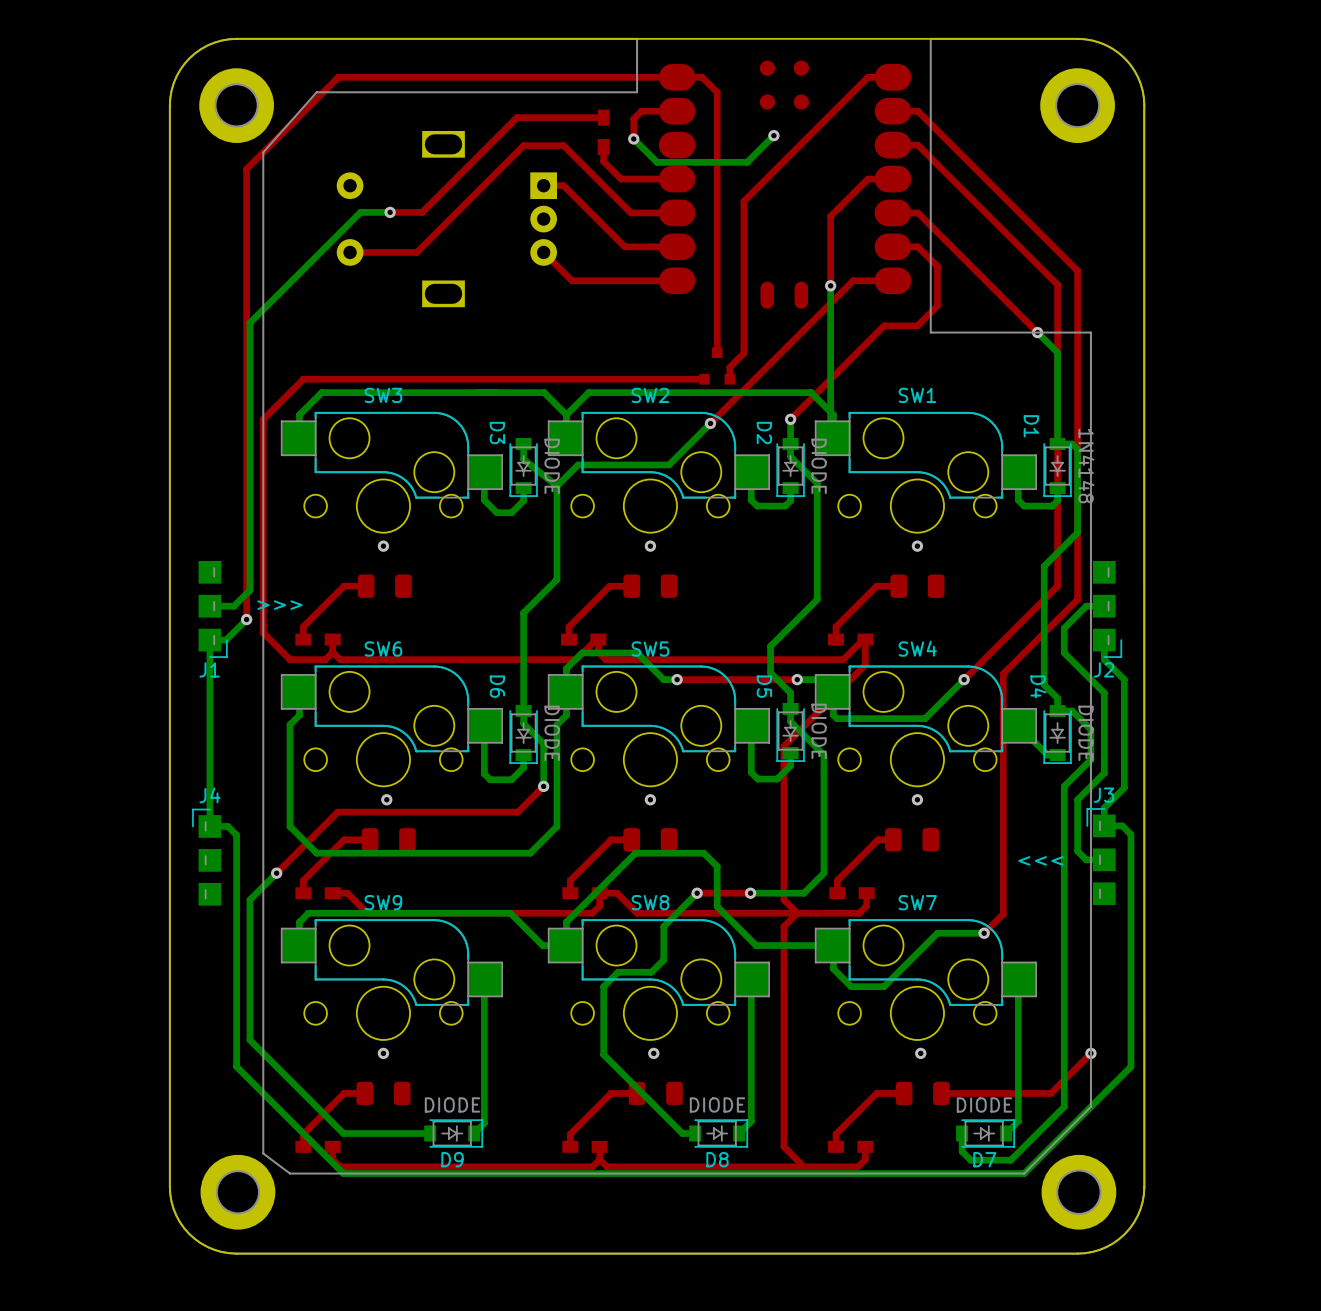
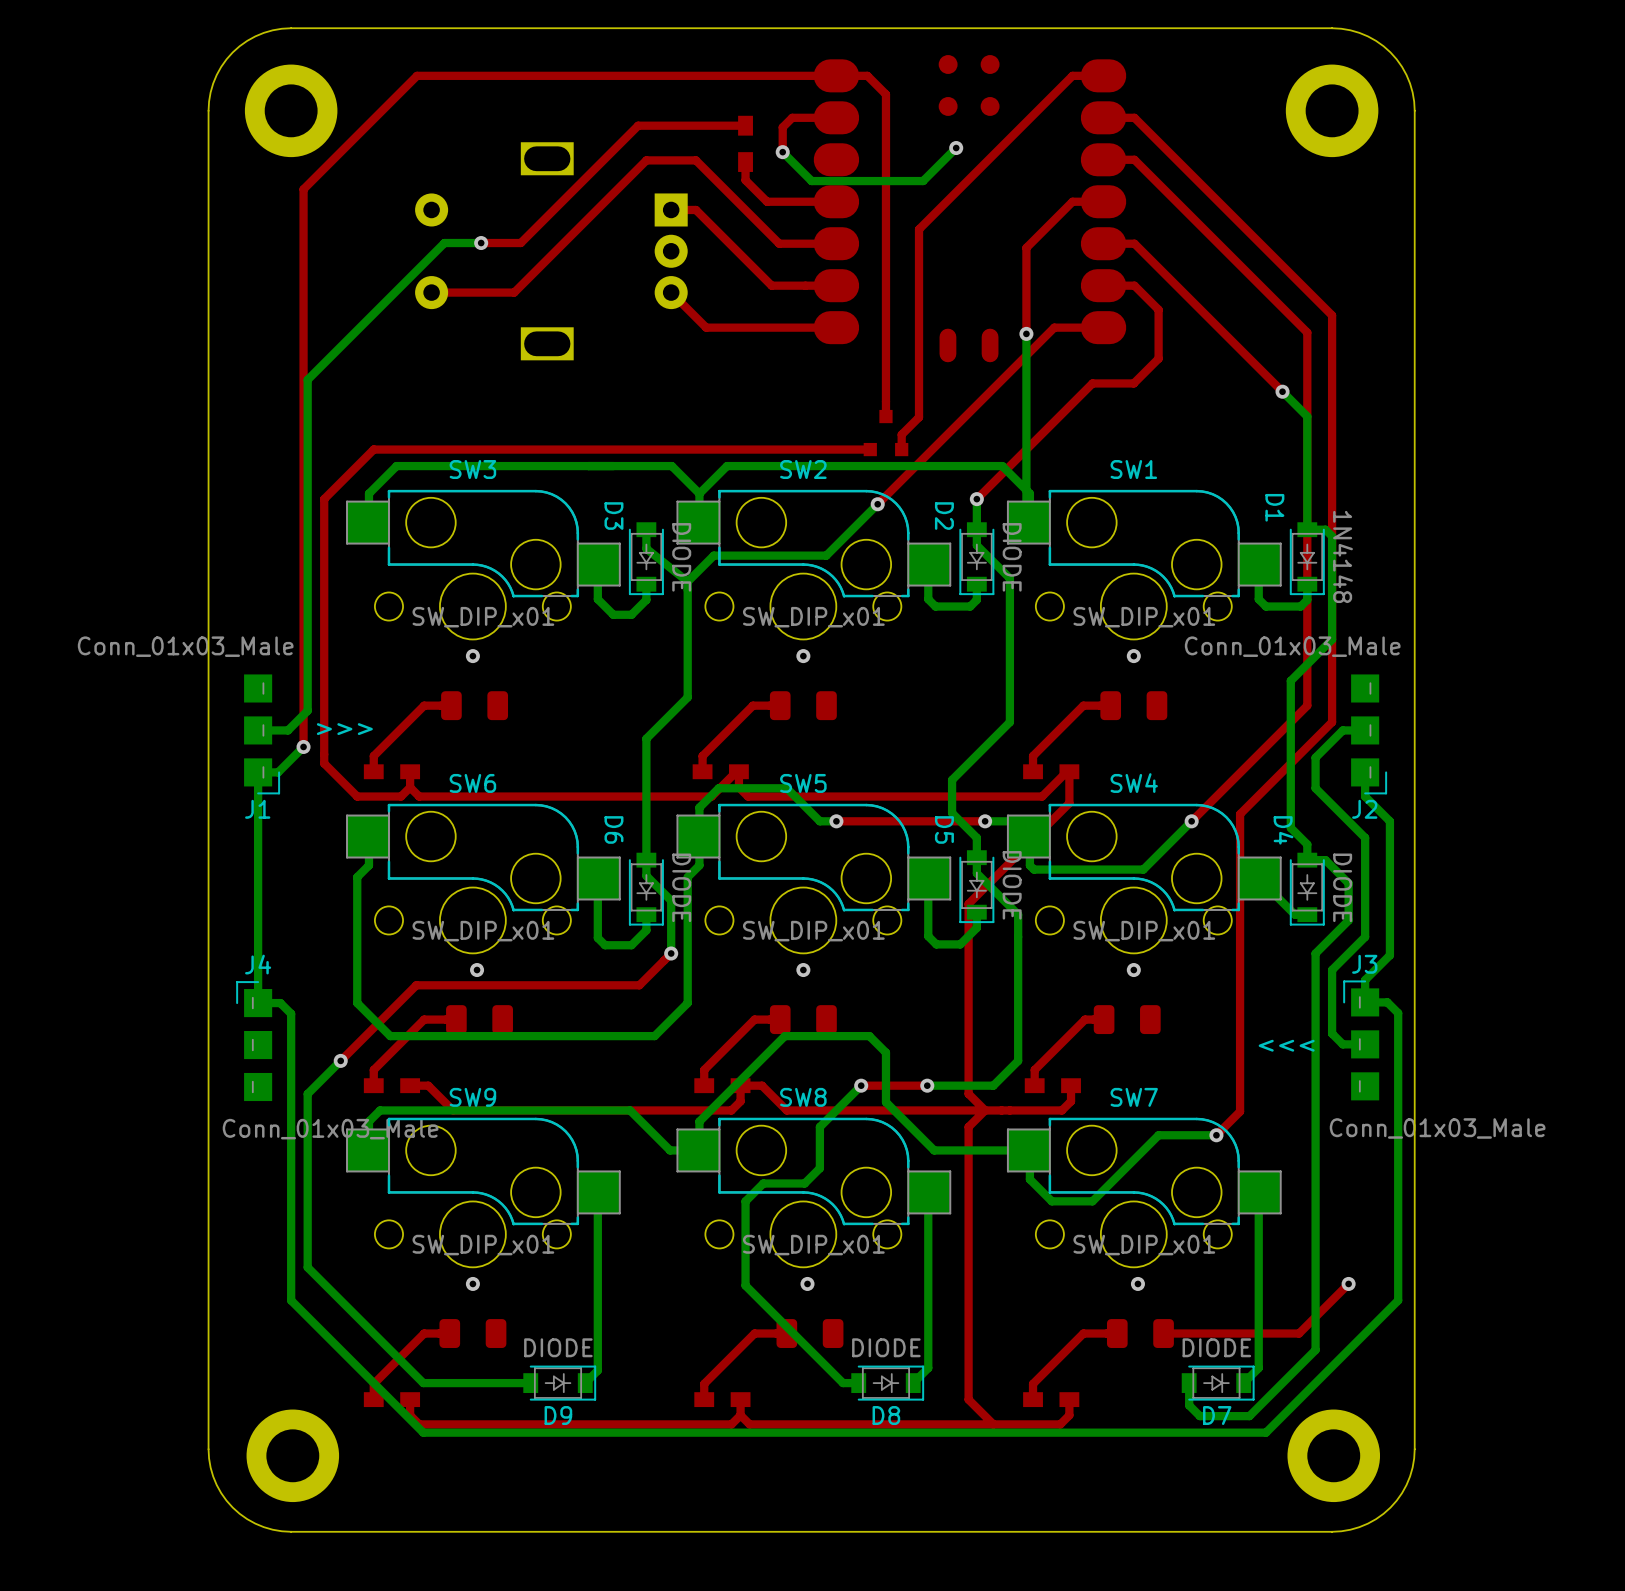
line: (1077, 38) (930, 38) (930, 332) (1090, 332) (1090, 1106) (1024, 1173) (290, 1173) (263, 1153) (263, 152) (316, 92) (637, 92) (637, 38) (236, 38) (221, 40) (207, 45) (194, 53) (184, 64) (173, 83) (169, 105) (169, 1186) (171, 1201) (176, 1215) (184, 1228) (194, 1239) (214, 1249) (236, 1253) (1077, 1253) (1092, 1251) (1106, 1247) (1119, 1239) (1129, 1228) (1140, 1208) (1144, 1186) (1144, 104) (1138, 77) (1121, 55) (1104, 44) (1077, 38) -> none
drawing: [214, 83, 259, 128] -> none
drawing: [1055, 83, 1101, 129] -> none
SW3 value: none -> SW_DIP_x01 (483, 617)
SW2 value: none -> SW_DIP_x01 (813, 617)
SW1 value: none -> SW_DIP_x01 (1144, 617)
J1 value: none -> Conn_01x03_Male (185, 646)
J2 value: none -> Conn_01x03_Male (1292, 646)
SW6 value: none -> SW_DIP_x01 (483, 931)
SW5 value: none -> SW_DIP_x01 (813, 931)
SW4 value: none -> SW_DIP_x01 (1144, 931)
J3 value: none -> Conn_01x03_Male (1437, 1128)
J4 value: none -> Conn_01x03_Male (330, 1129)
SW9 value: none -> SW_DIP_x01 (483, 1245)
SW8 value: none -> SW_DIP_x01 (813, 1245)
SW7 value: none -> SW_DIP_x01 (1144, 1245)
drawing: [1056, 1169, 1102, 1215] -> none
drawing: [215, 1170, 261, 1215] -> none

